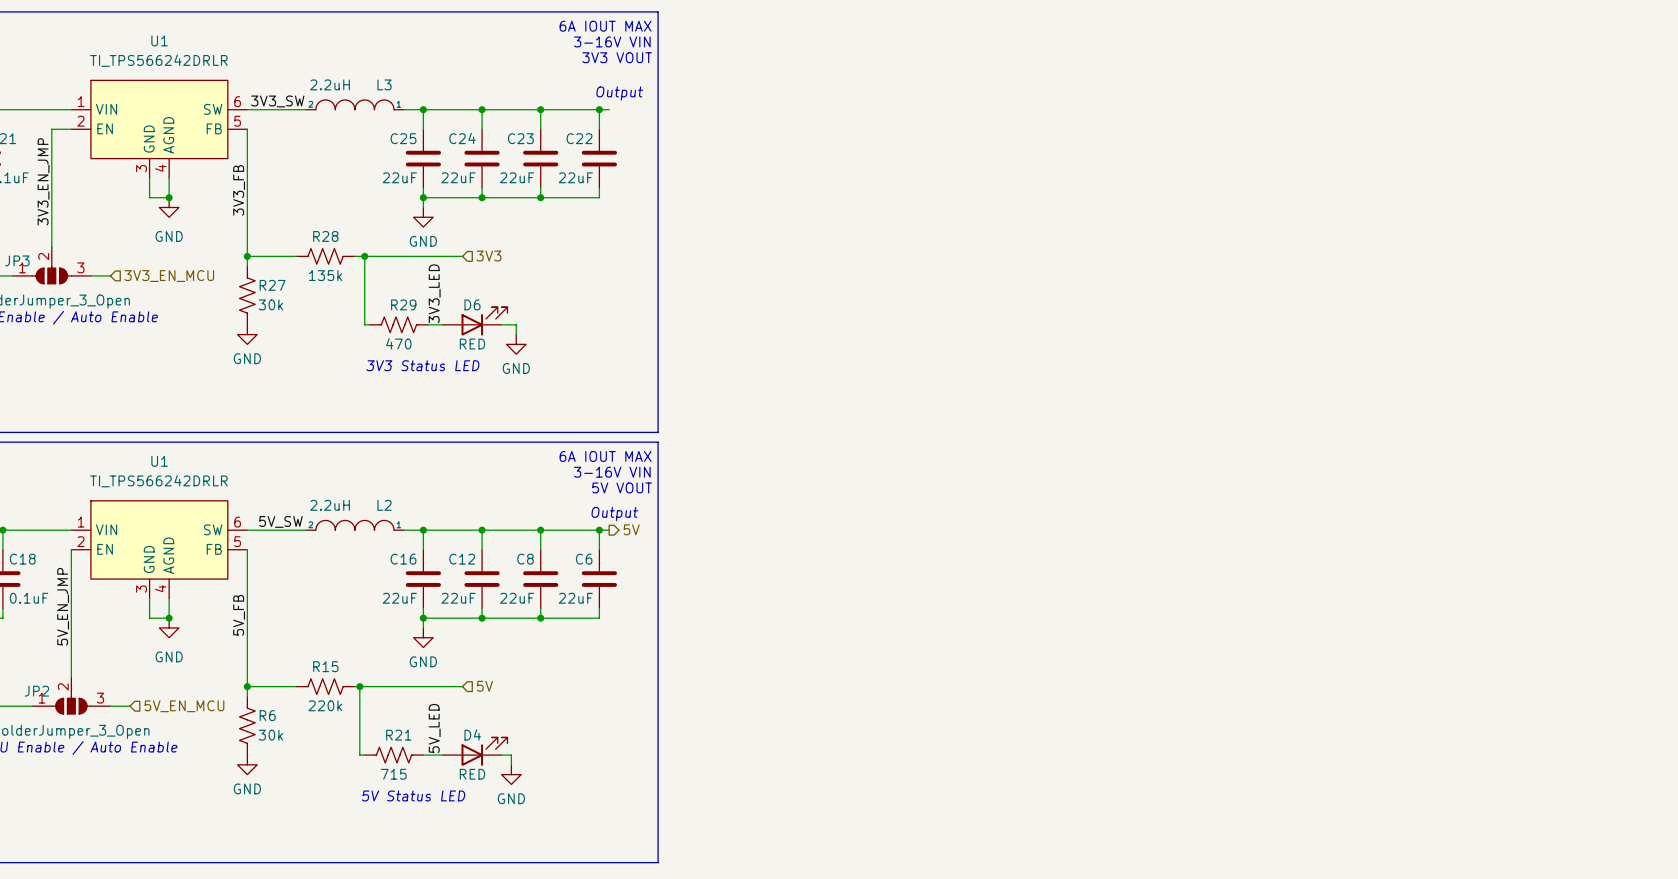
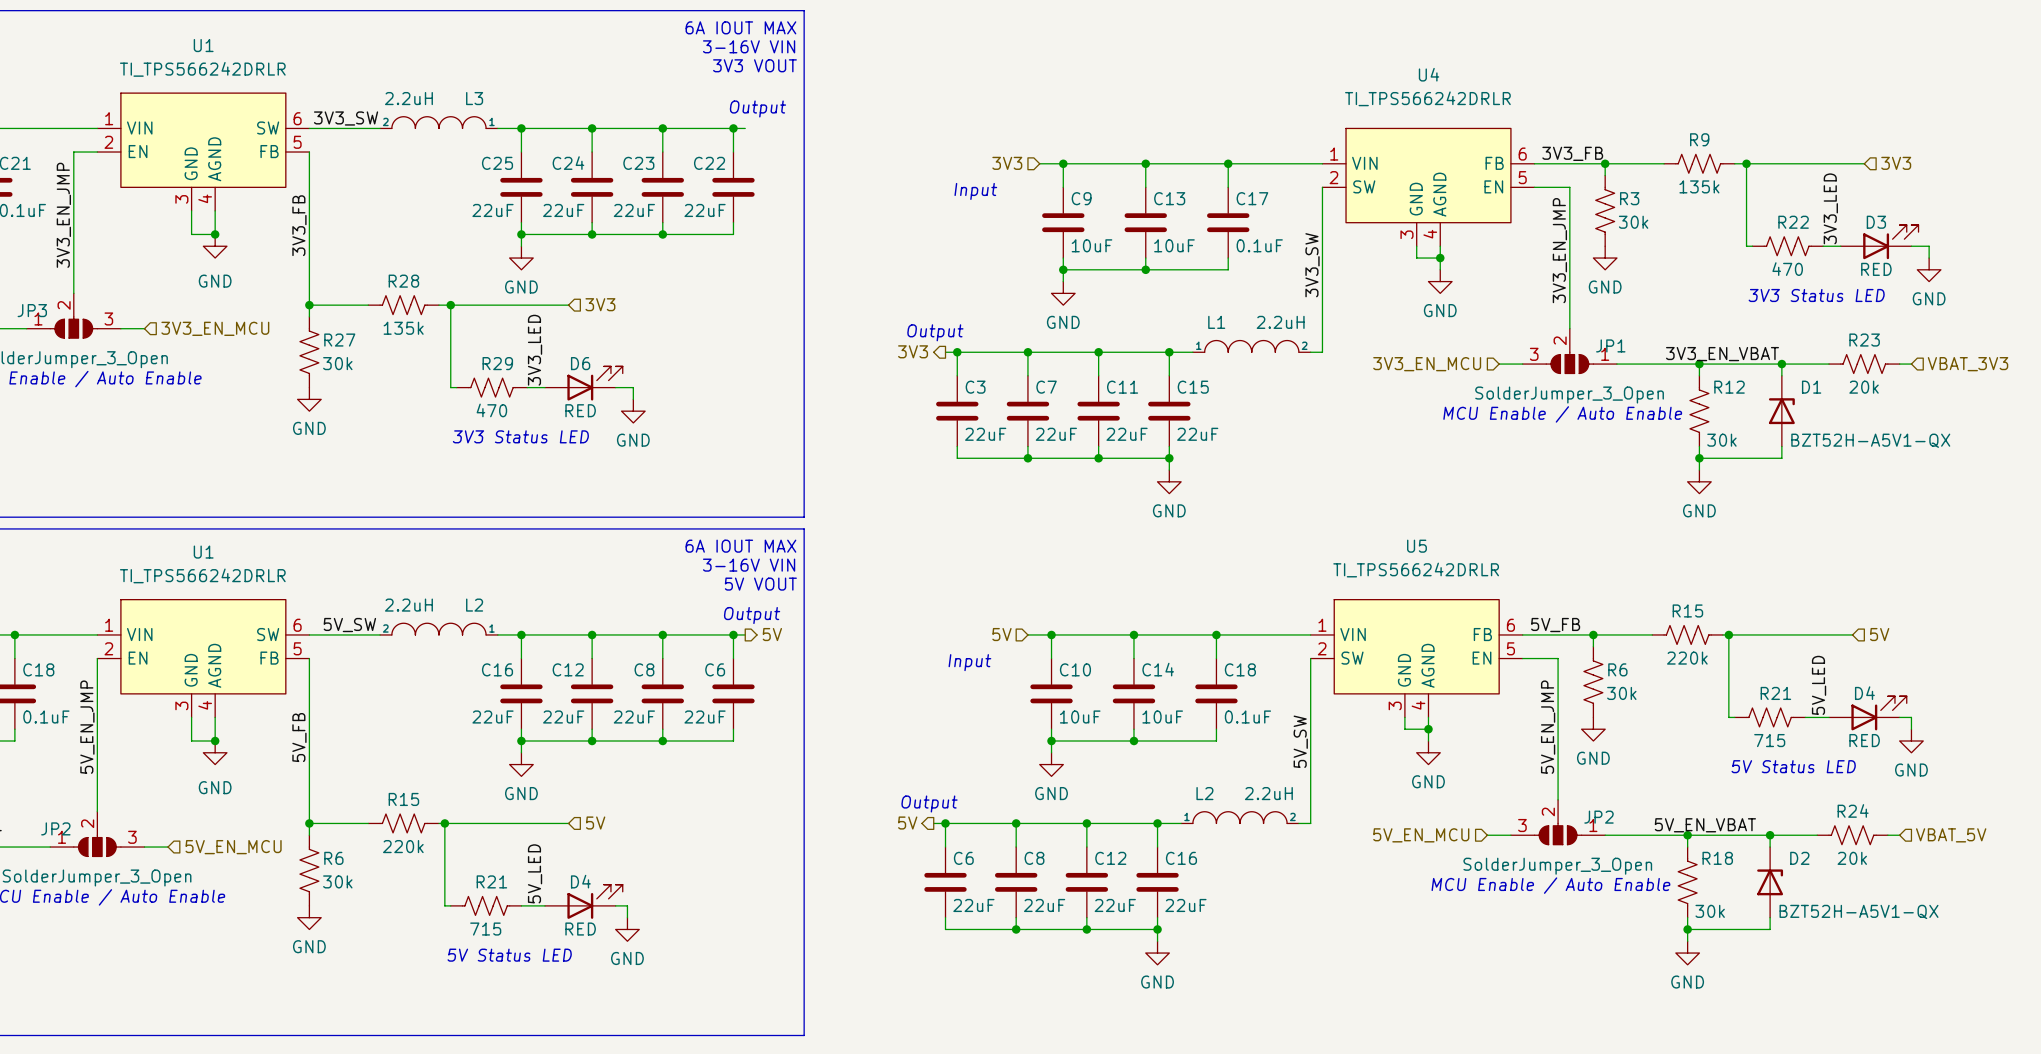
label: none -> 3V3_FB (1572, 153)
hierarchical label: none -> 3V3 (1007, 163)
hierarchical label: none -> 3V3 (1896, 163)
wire: none -> (1039, 163) (1322, 163)
wire: none -> (1063, 163) (1063, 187)
junction: none -> (1063, 163)
wire: none -> (1145, 163) (1145, 187)
junction: none -> (1145, 163)
wire: none -> (1228, 163) (1228, 187)
junction: none -> (1228, 163)
wire: none -> (1534, 163) (1664, 163)
wire: none -> (1605, 163) (1605, 175)
junction: none -> (1605, 163)
R9: none -> 135k (1699, 163)
wire: none -> (1734, 163) (1864, 163)
wire: none -> (1746, 163) (1746, 246) (1752, 246)
junction: none -> (1746, 163)
wire: none -> (1322, 187) (1322, 352) (1310, 352)
U4: none -> TI_TPS566242DRLR (1428, 187)
wire: none -> (1534, 187) (1569, 187) (1569, 328)
text: none -> Input (975, 191)
label: none -> 3V3_LED (1830, 208)
R3: none -> 30k (1605, 210)
C9: none -> 10uF (1063, 222)
C13: none -> 10uF (1145, 222)
C17: none -> 0.1uF (1228, 222)
D3: none -> RED (1879, 242)
wire: none -> (1416, 246) (1416, 258) (1440, 258)
wire: none -> (1440, 246) (1440, 269)
R22: none -> 470 (1787, 246)
wire: none -> (1823, 246) (1840, 246)
wire: none -> (1911, 246) (1929, 246) (1929, 258)
label: none -> 3V3_EN_JMP (1559, 250)
wire: none -> (1063, 258) (1063, 281)
wire: none -> (1145, 258) (1145, 269)
wire: none -> (1228, 258) (1228, 269) (1063, 269)
junction: none -> (1440, 258)
power symbol: none -> GND (1605, 258)
label: none -> 3V3_SW (1312, 265)
junction: none -> (1063, 269)
junction: none -> (1145, 269)
power symbol: none -> GND (1929, 269)
power symbol: none -> GND (1440, 281)
power symbol: none -> GND (1063, 293)
text: none -> 3V3 Status LED (1816, 295)
text: none -> Output (935, 332)
L1: none -> 2.2uH (1251, 346)
JP1: none -> SolderJumper_3_Open (1569, 351)
hierarchical label: none -> 3V3 (913, 351)
wire: none -> (945, 352) (1192, 352)
wire: none -> (957, 352) (957, 375)
junction: none -> (957, 352)
wire: none -> (1027, 352) (1027, 375)
junction: none -> (1027, 352)
wire: none -> (1098, 352) (1098, 375)
junction: none -> (1098, 352)
wire: none -> (1169, 352) (1169, 375)
junction: none -> (1169, 352)
label: none -> 3V3_EN_VBAT (1722, 354)
hierarchical label: none -> 3V3_EN_MCU (1427, 364)
wire: none -> (1499, 364) (1522, 364)
wire: none -> (1616, 364) (1828, 364)
wire: none -> (1699, 364) (1699, 375)
junction: none -> (1699, 364)
wire: none -> (1781, 364) (1781, 375)
junction: none -> (1781, 364)
R23: none -> 20k (1864, 364)
wire: none -> (1899, 364) (1911, 364)
hierarchical label: none -> VBAT_3V3 (1968, 364)
C3: none -> 22uF (957, 411)
C7: none -> 22uF (1027, 411)
C11: none -> 22uF (1098, 411)
C15: none -> 22uF (1169, 411)
R12: none -> 30k (1699, 411)
D1: none -> BZT52H-A5V1-QX (1781, 411)
text: none -> MCU Enable / Auto Enable (1562, 414)
wire: none -> (957, 446) (957, 458) (1169, 458)
wire: none -> (1027, 446) (1027, 458)
wire: none -> (1098, 446) (1098, 458)
wire: none -> (1169, 446) (1169, 470)
wire: none -> (1699, 446) (1699, 470)
wire: none -> (1781, 446) (1781, 458) (1699, 458)
junction: none -> (1027, 458)
junction: none -> (1098, 458)
junction: none -> (1169, 458)
junction: none -> (1699, 458)
power symbol: none -> GND (1169, 481)
power symbol: none -> GND (1699, 481)
label: none -> 5V_FB (1555, 625)
hierarchical label: none -> 5V (1001, 634)
hierarchical label: none -> 5V (1879, 634)
wire: none -> (1027, 634) (1310, 634)
wire: none -> (1051, 634) (1051, 658)
junction: none -> (1051, 634)
wire: none -> (1133, 634) (1133, 658)
junction: none -> (1133, 634)
wire: none -> (1216, 634) (1216, 658)
junction: none -> (1216, 634)
wire: none -> (1522, 634) (1652, 634)
wire: none -> (1593, 634) (1593, 646)
junction: none -> (1593, 634)
R15: none -> 220k (1687, 634)
wire: none -> (1722, 634) (1852, 634)
wire: none -> (1728, 634) (1728, 717) (1734, 717)
junction: none -> (1728, 634)
wire: none -> (1310, 658) (1310, 823) (1298, 823)
U5: none -> TI_TPS566242DRLR (1416, 658)
wire: none -> (1522, 658) (1558, 658) (1558, 799)
text: none -> Input (969, 662)
R6: none -> 30k (1593, 682)
label: none -> 5V_LED (1819, 685)
C10: none -> 10uF (1051, 693)
C14: none -> 10uF (1133, 693)
C18: none -> 0.1uF (1216, 693)
D4: none -> RED (1867, 713)
wire: none -> (1404, 717) (1404, 729) (1428, 729)
wire: none -> (1428, 717) (1428, 740)
R21: none -> 715 (1770, 717)
wire: none -> (1805, 717) (1828, 717)
wire: none -> (1899, 717) (1911, 717) (1911, 729)
label: none -> 5V_EN_JMP (1548, 727)
wire: none -> (1051, 729) (1051, 752)
wire: none -> (1133, 729) (1133, 740)
wire: none -> (1216, 729) (1216, 740) (1051, 740)
junction: none -> (1428, 729)
power symbol: none -> GND (1593, 729)
junction: none -> (1051, 740)
junction: none -> (1133, 740)
label: none -> 5V_SW (1300, 741)
power symbol: none -> GND (1911, 740)
power symbol: none -> GND (1428, 752)
power symbol: none -> GND (1051, 764)
text: none -> 5V Status LED (1793, 766)
text: none -> Output (929, 803)
L2: none -> 2.2uH (1240, 817)
JP2: none -> SolderJumper_3_Open (1558, 822)
hierarchical label: none -> 5V (907, 823)
wire: none -> (933, 823) (1181, 823)
wire: none -> (945, 823) (945, 847)
junction: none -> (945, 823)
wire: none -> (1016, 823) (1016, 847)
junction: none -> (1016, 823)
wire: none -> (1086, 823) (1086, 847)
junction: none -> (1086, 823)
wire: none -> (1157, 823) (1157, 847)
junction: none -> (1157, 823)
label: none -> 5V_EN_VBAT (1705, 825)
hierarchical label: none -> 5V_EN_MCU (1421, 835)
wire: none -> (1487, 835) (1510, 835)
wire: none -> (1605, 835) (1817, 835)
wire: none -> (1687, 835) (1687, 847)
junction: none -> (1687, 835)
wire: none -> (1770, 835) (1770, 847)
junction: none -> (1770, 835)
R24: none -> 20k (1852, 835)
wire: none -> (1887, 835) (1899, 835)
hierarchical label: none -> VBAT_5V (1951, 835)
C6: none -> 22uF (945, 882)
C8: none -> 22uF (1016, 882)
C12: none -> 22uF (1086, 882)
C16: none -> 22uF (1157, 882)
R18: none -> 30k (1687, 882)
D2: none -> BZT52H-A5V1-QX (1770, 882)
text: none -> MCU Enable / Auto Enable (1550, 885)
wire: none -> (945, 917) (945, 929) (1157, 929)
wire: none -> (1016, 917) (1016, 929)
wire: none -> (1086, 917) (1086, 929)
wire: none -> (1157, 917) (1157, 941)
wire: none -> (1687, 917) (1687, 941)
wire: none -> (1770, 917) (1770, 929) (1687, 929)
junction: none -> (1016, 929)
junction: none -> (1086, 929)
junction: none -> (1157, 929)
junction: none -> (1687, 929)
power symbol: none -> GND (1157, 953)
power symbol: none -> GND (1687, 953)

